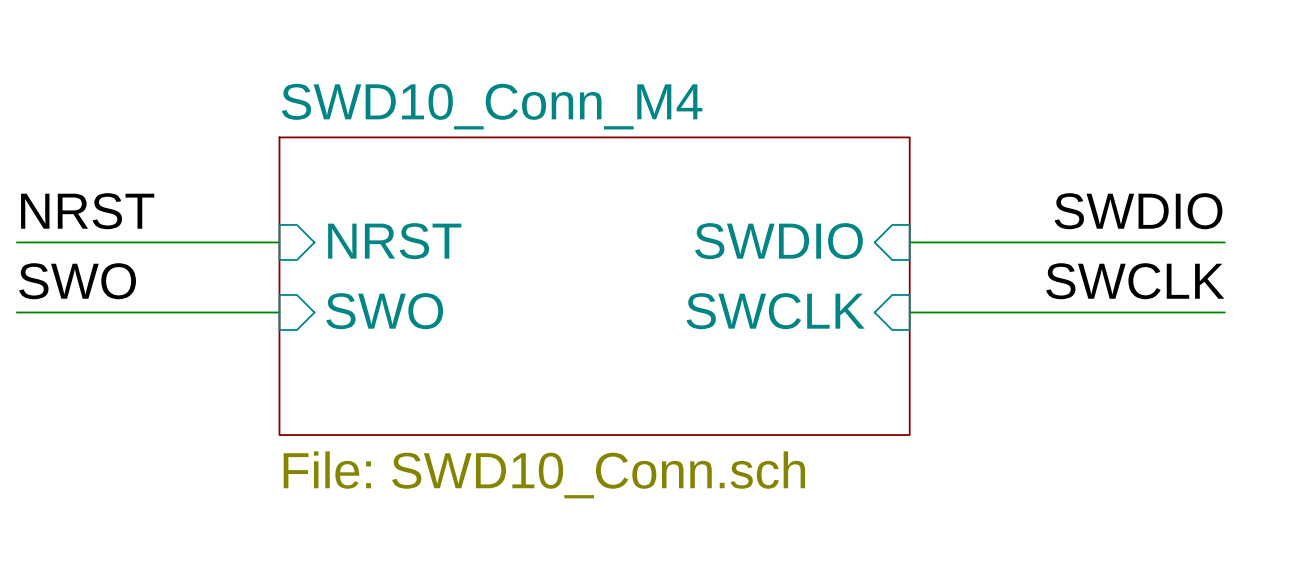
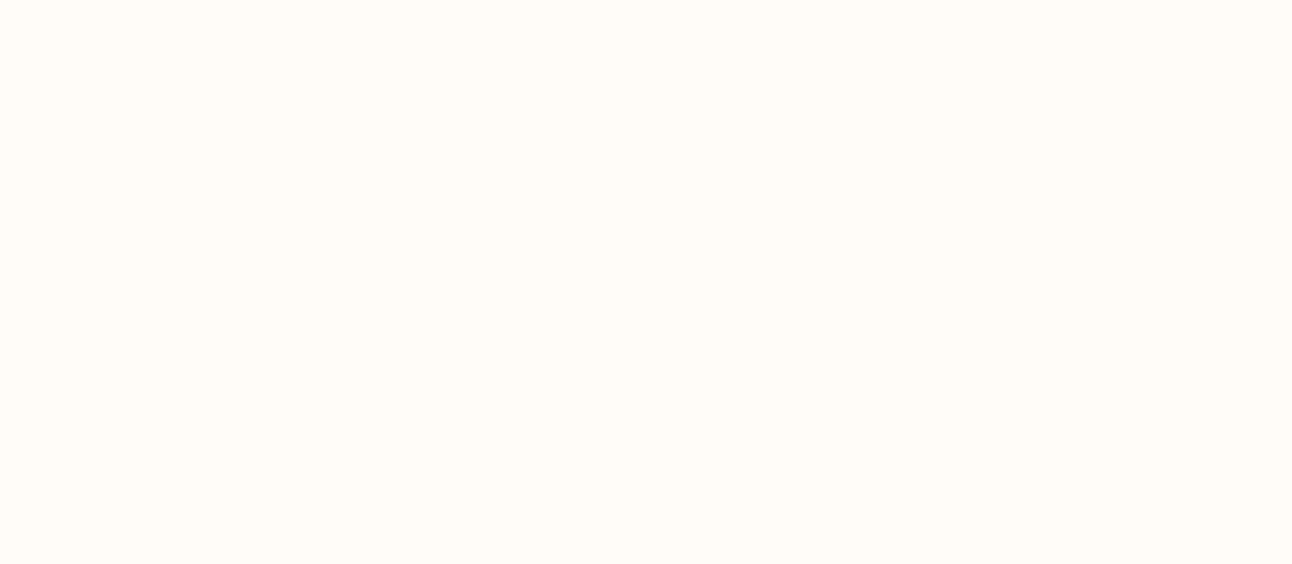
label: NRST (87, 211) -> none
label: SWDIO (1138, 211) -> none
sheet pin: NRST (394, 241) -> none
sheet pin: SWDIO (778, 241) -> none
wire: (16, 242) (279, 242) -> none
wire: (909, 242) (1224, 242) -> none
label: SWO (77, 281) -> none
label: SWCLK (1135, 281) -> none
sheet SWD10_Conn_M4: File: SWD10_Conn.sch (594, 286) -> none
sheet pin: SWO (384, 311) -> none
sheet pin: SWCLK (775, 311) -> none
wire: (16, 312) (279, 312) -> none
wire: (909, 312) (1224, 312) -> none

